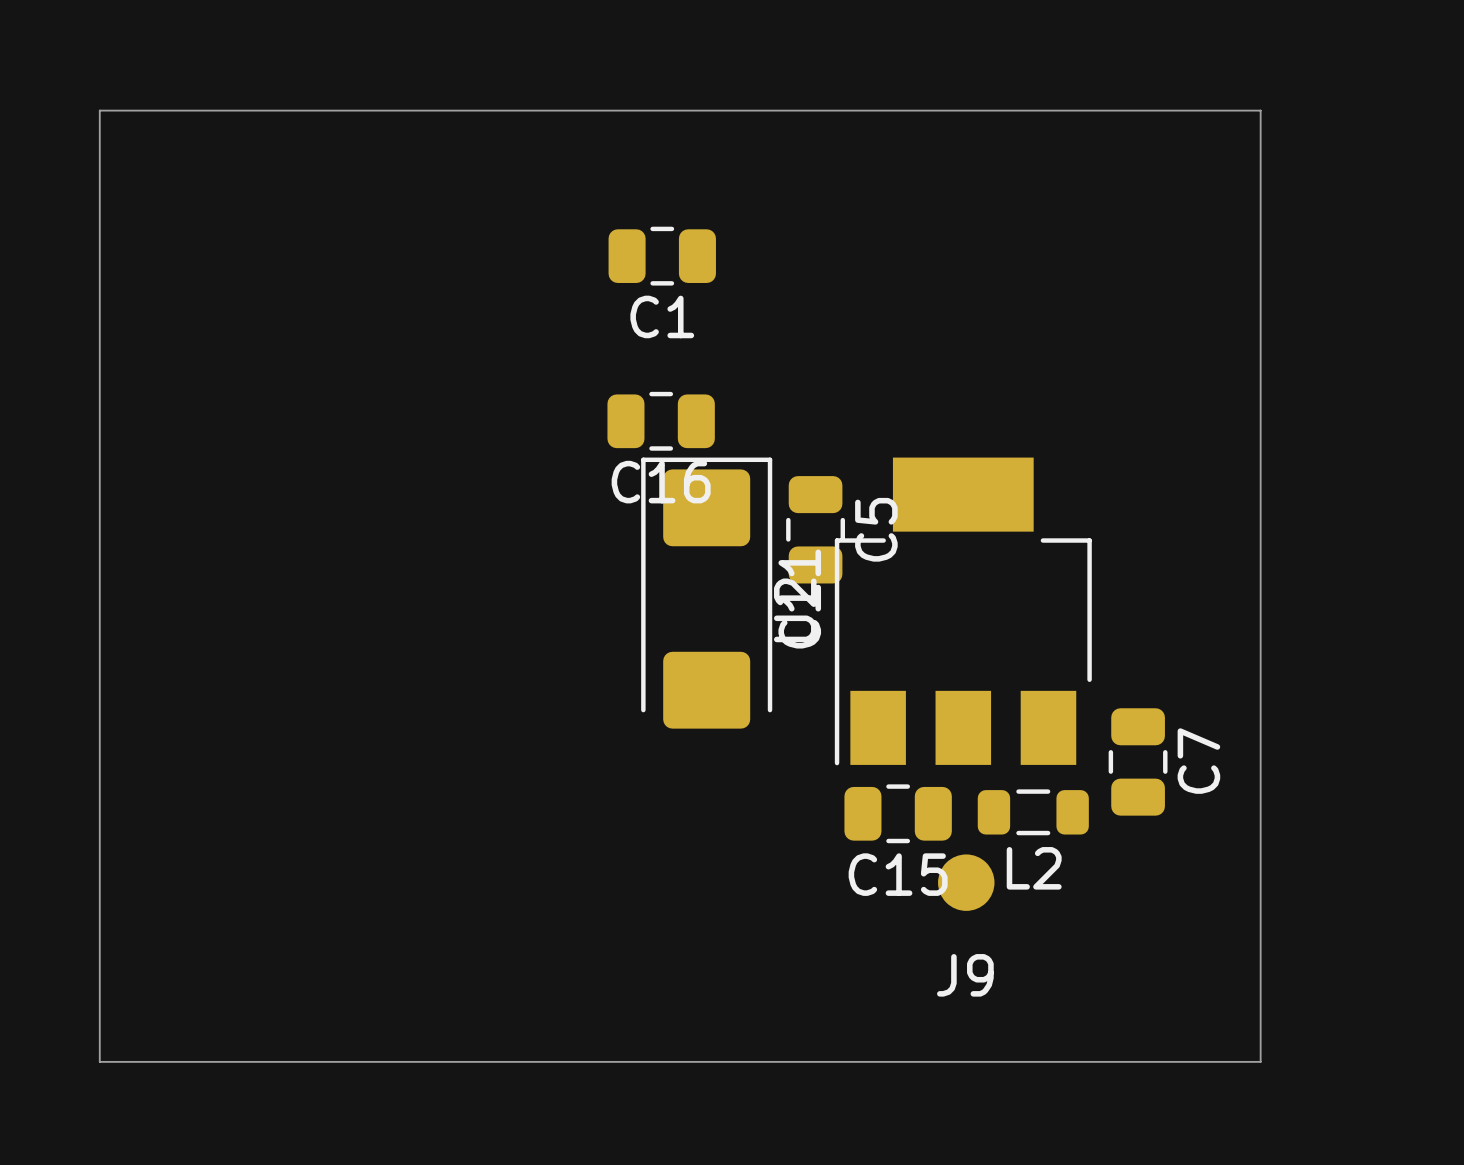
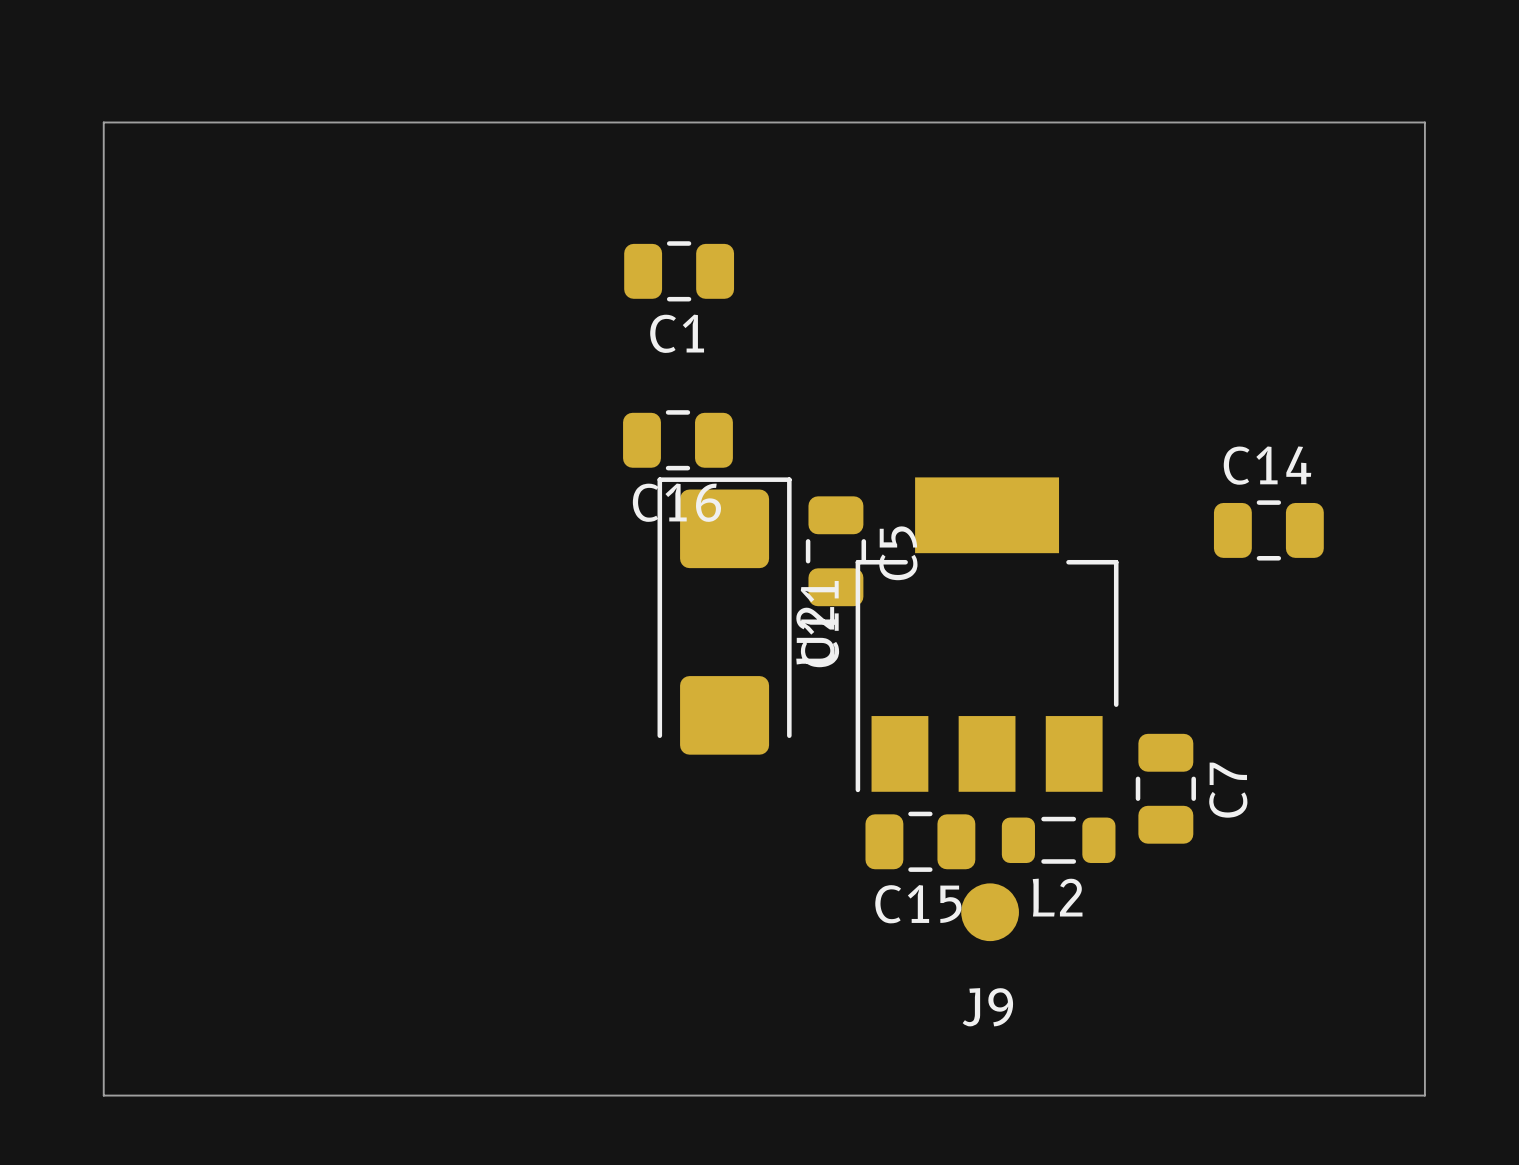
board edge: (1260, 110) (1260, 1061) -> (1291, 122) (1424, 122) (1424, 1095) (1291, 1095)
C14: none -> (1268, 530)

